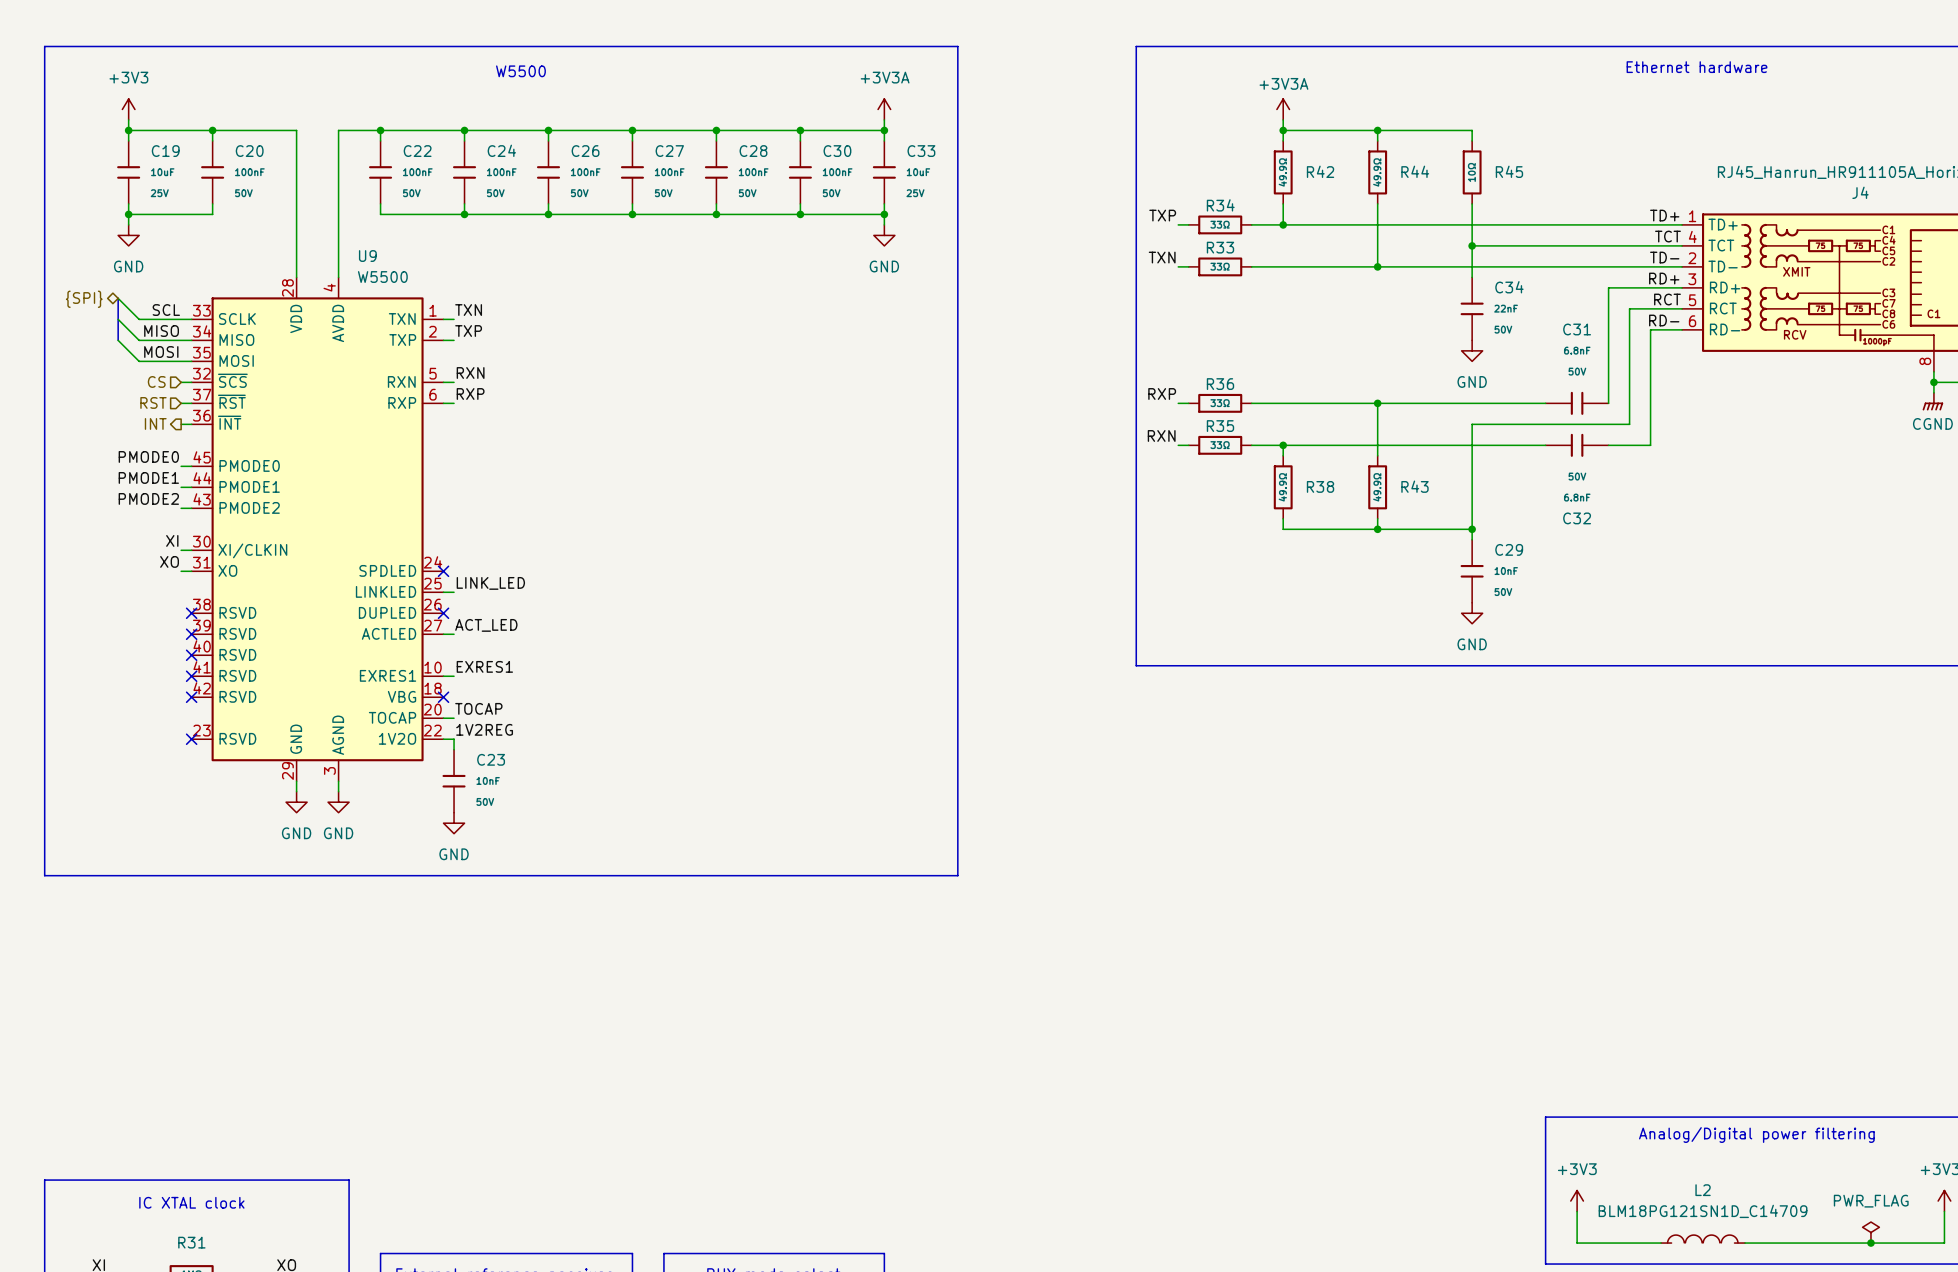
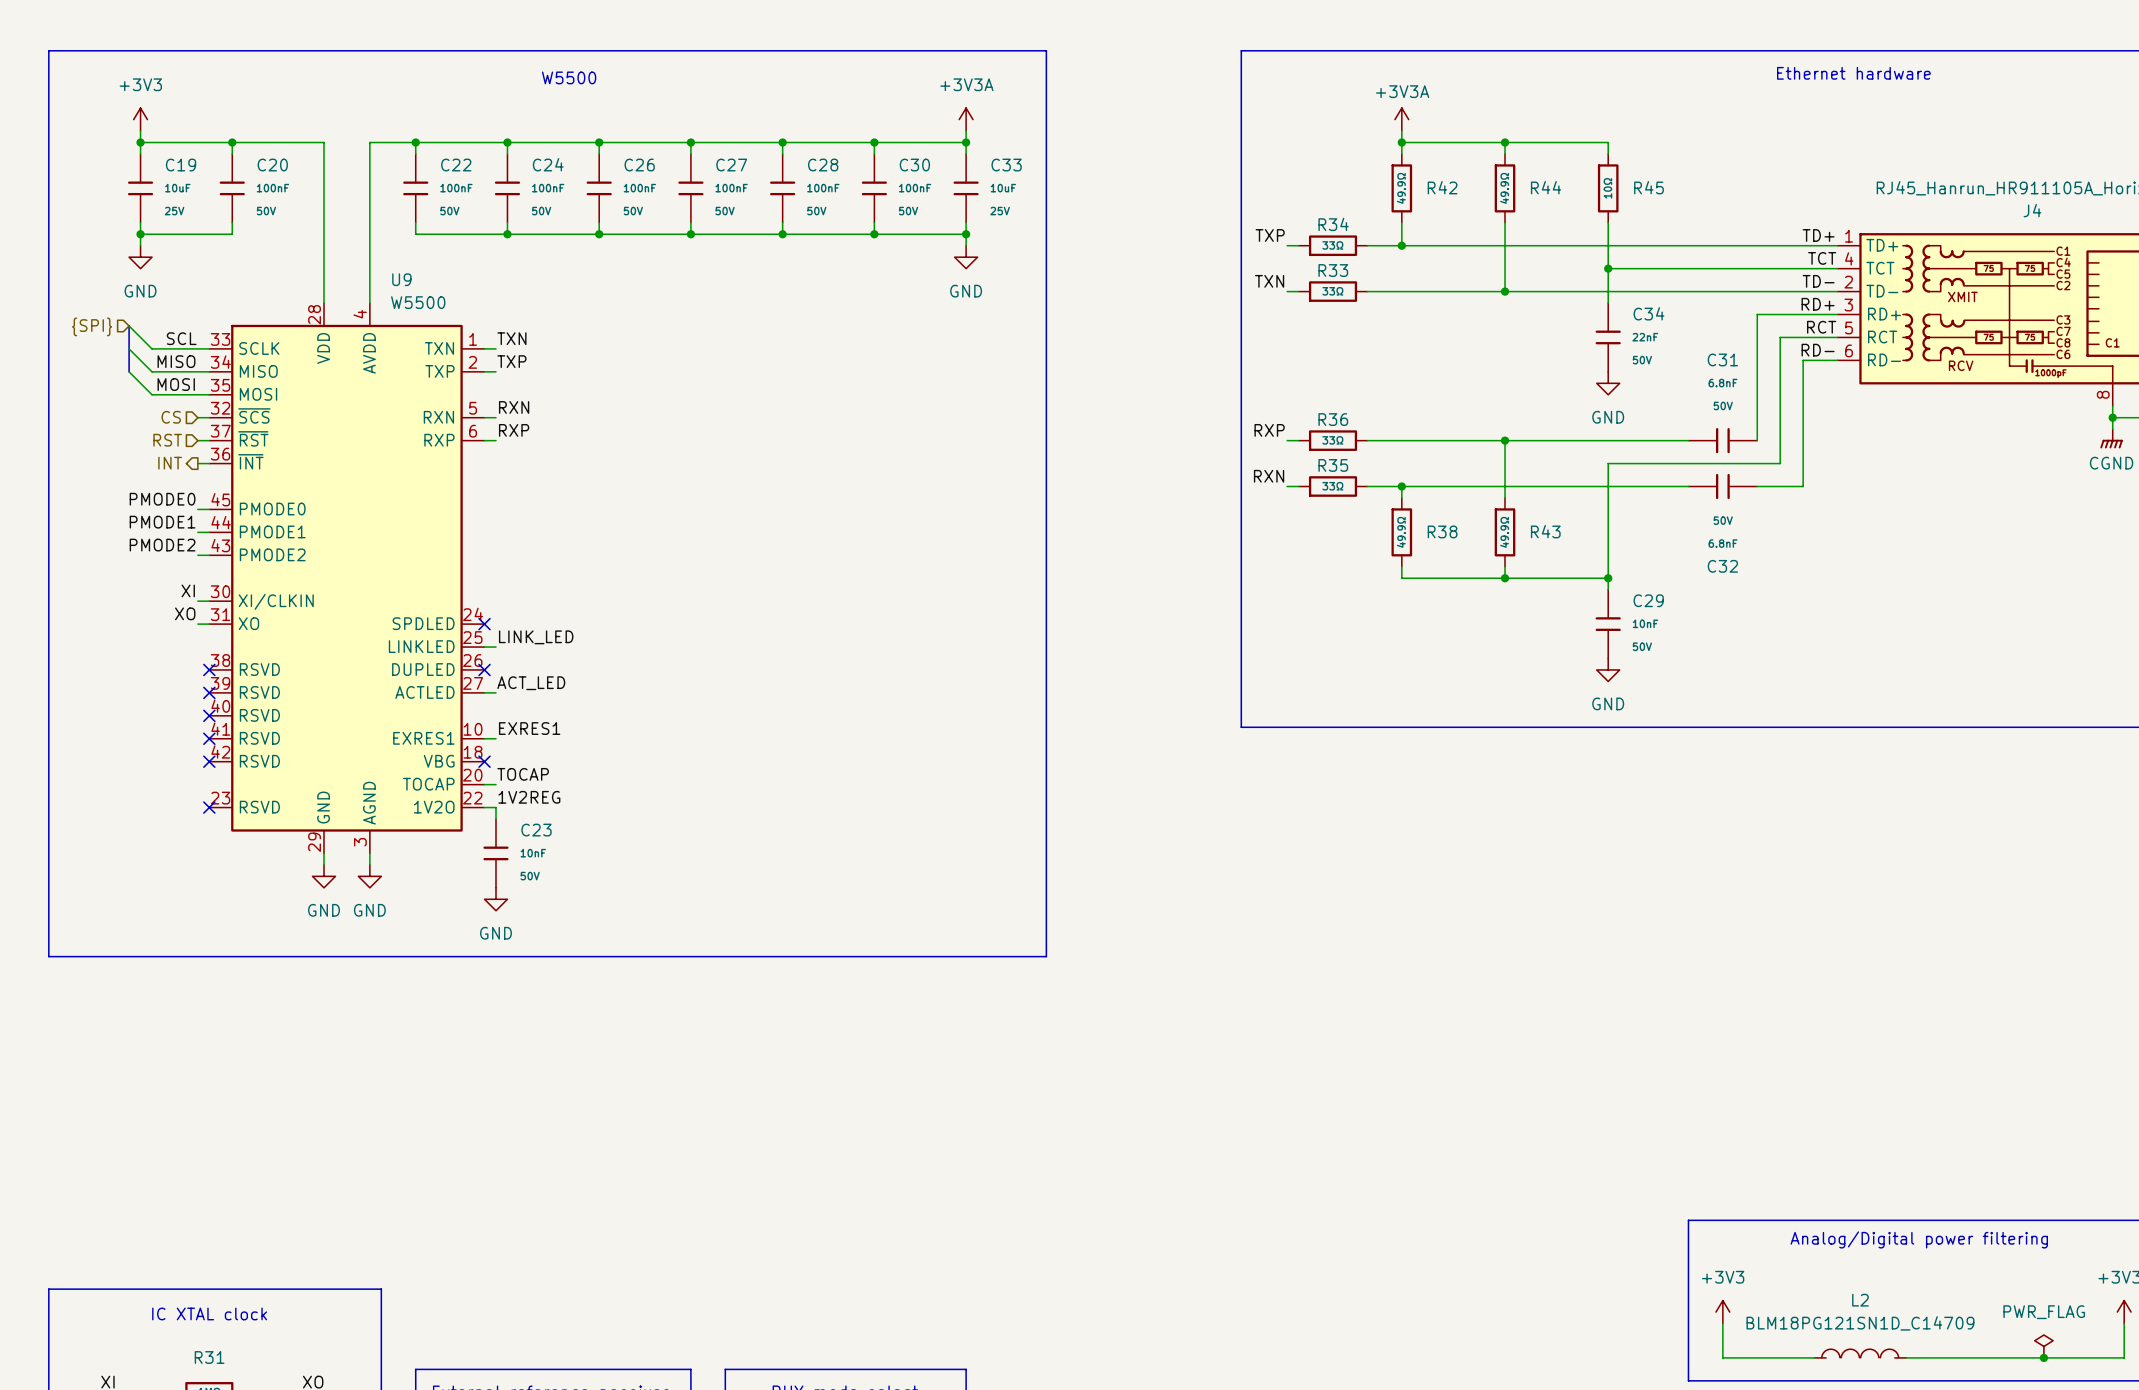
hierarchical label shape: bidirectional (84, 299) -> input (92, 326)

